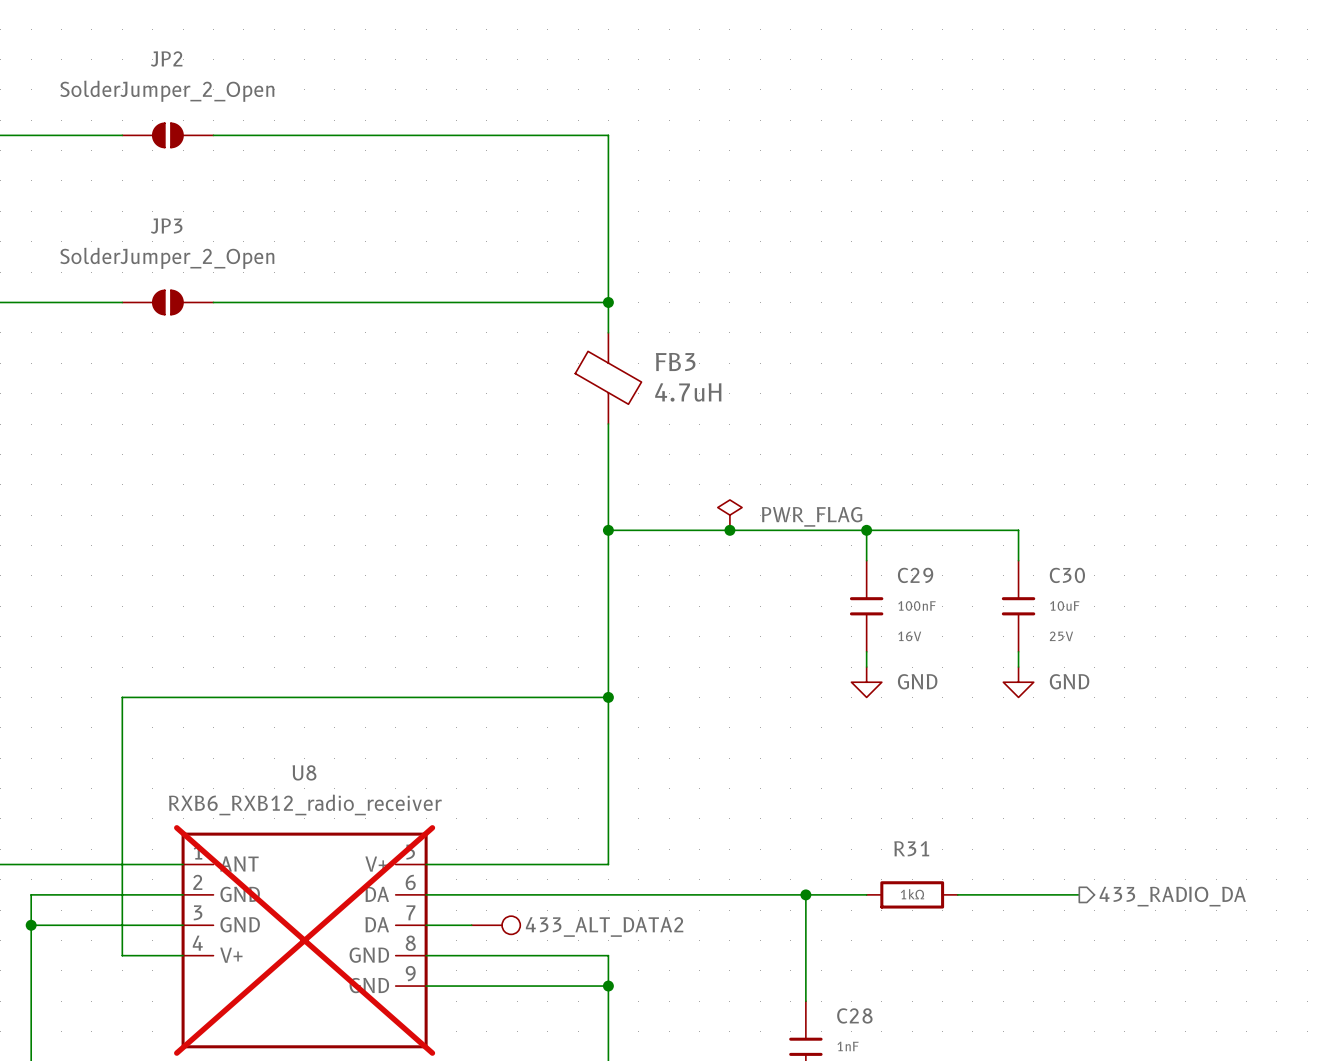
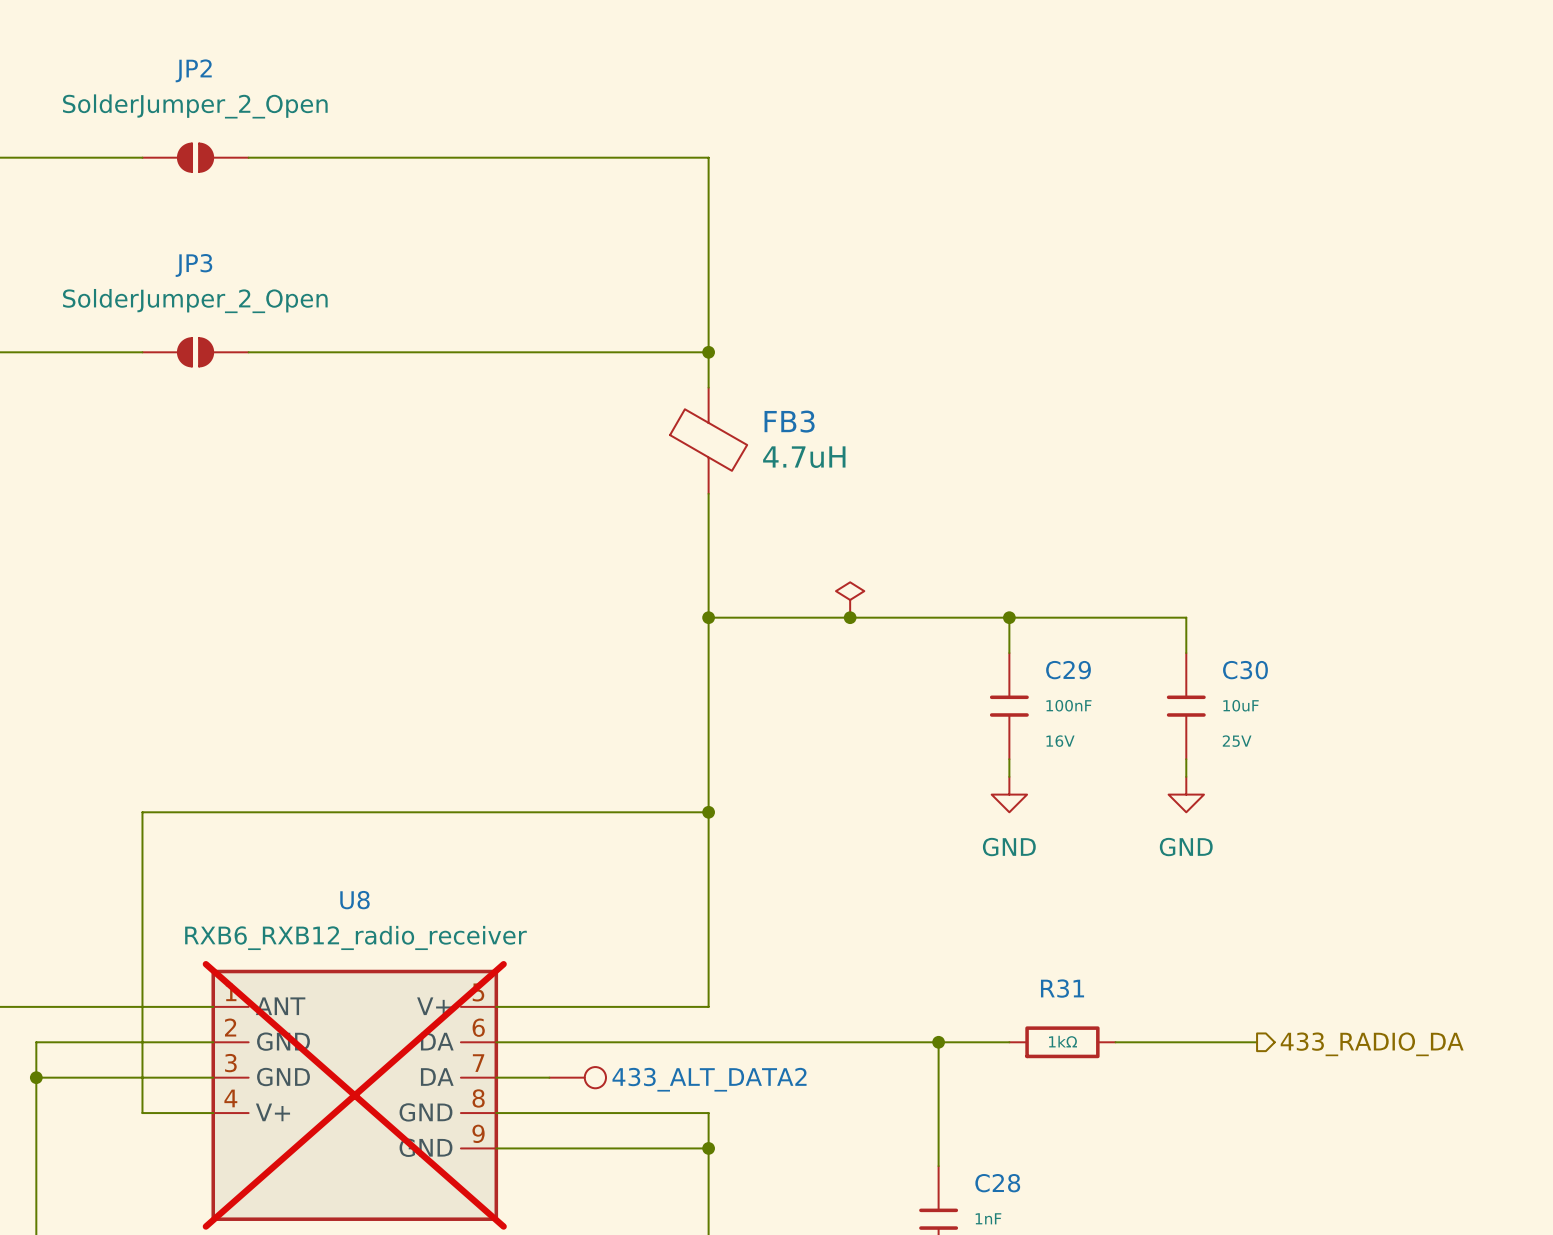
power symbol text: PWR_FLAG (812, 516) -> none
power symbol text position: GND (917, 681) -> GND (1009, 847)
power symbol text position: GND (1069, 681) -> GND (1186, 847)

